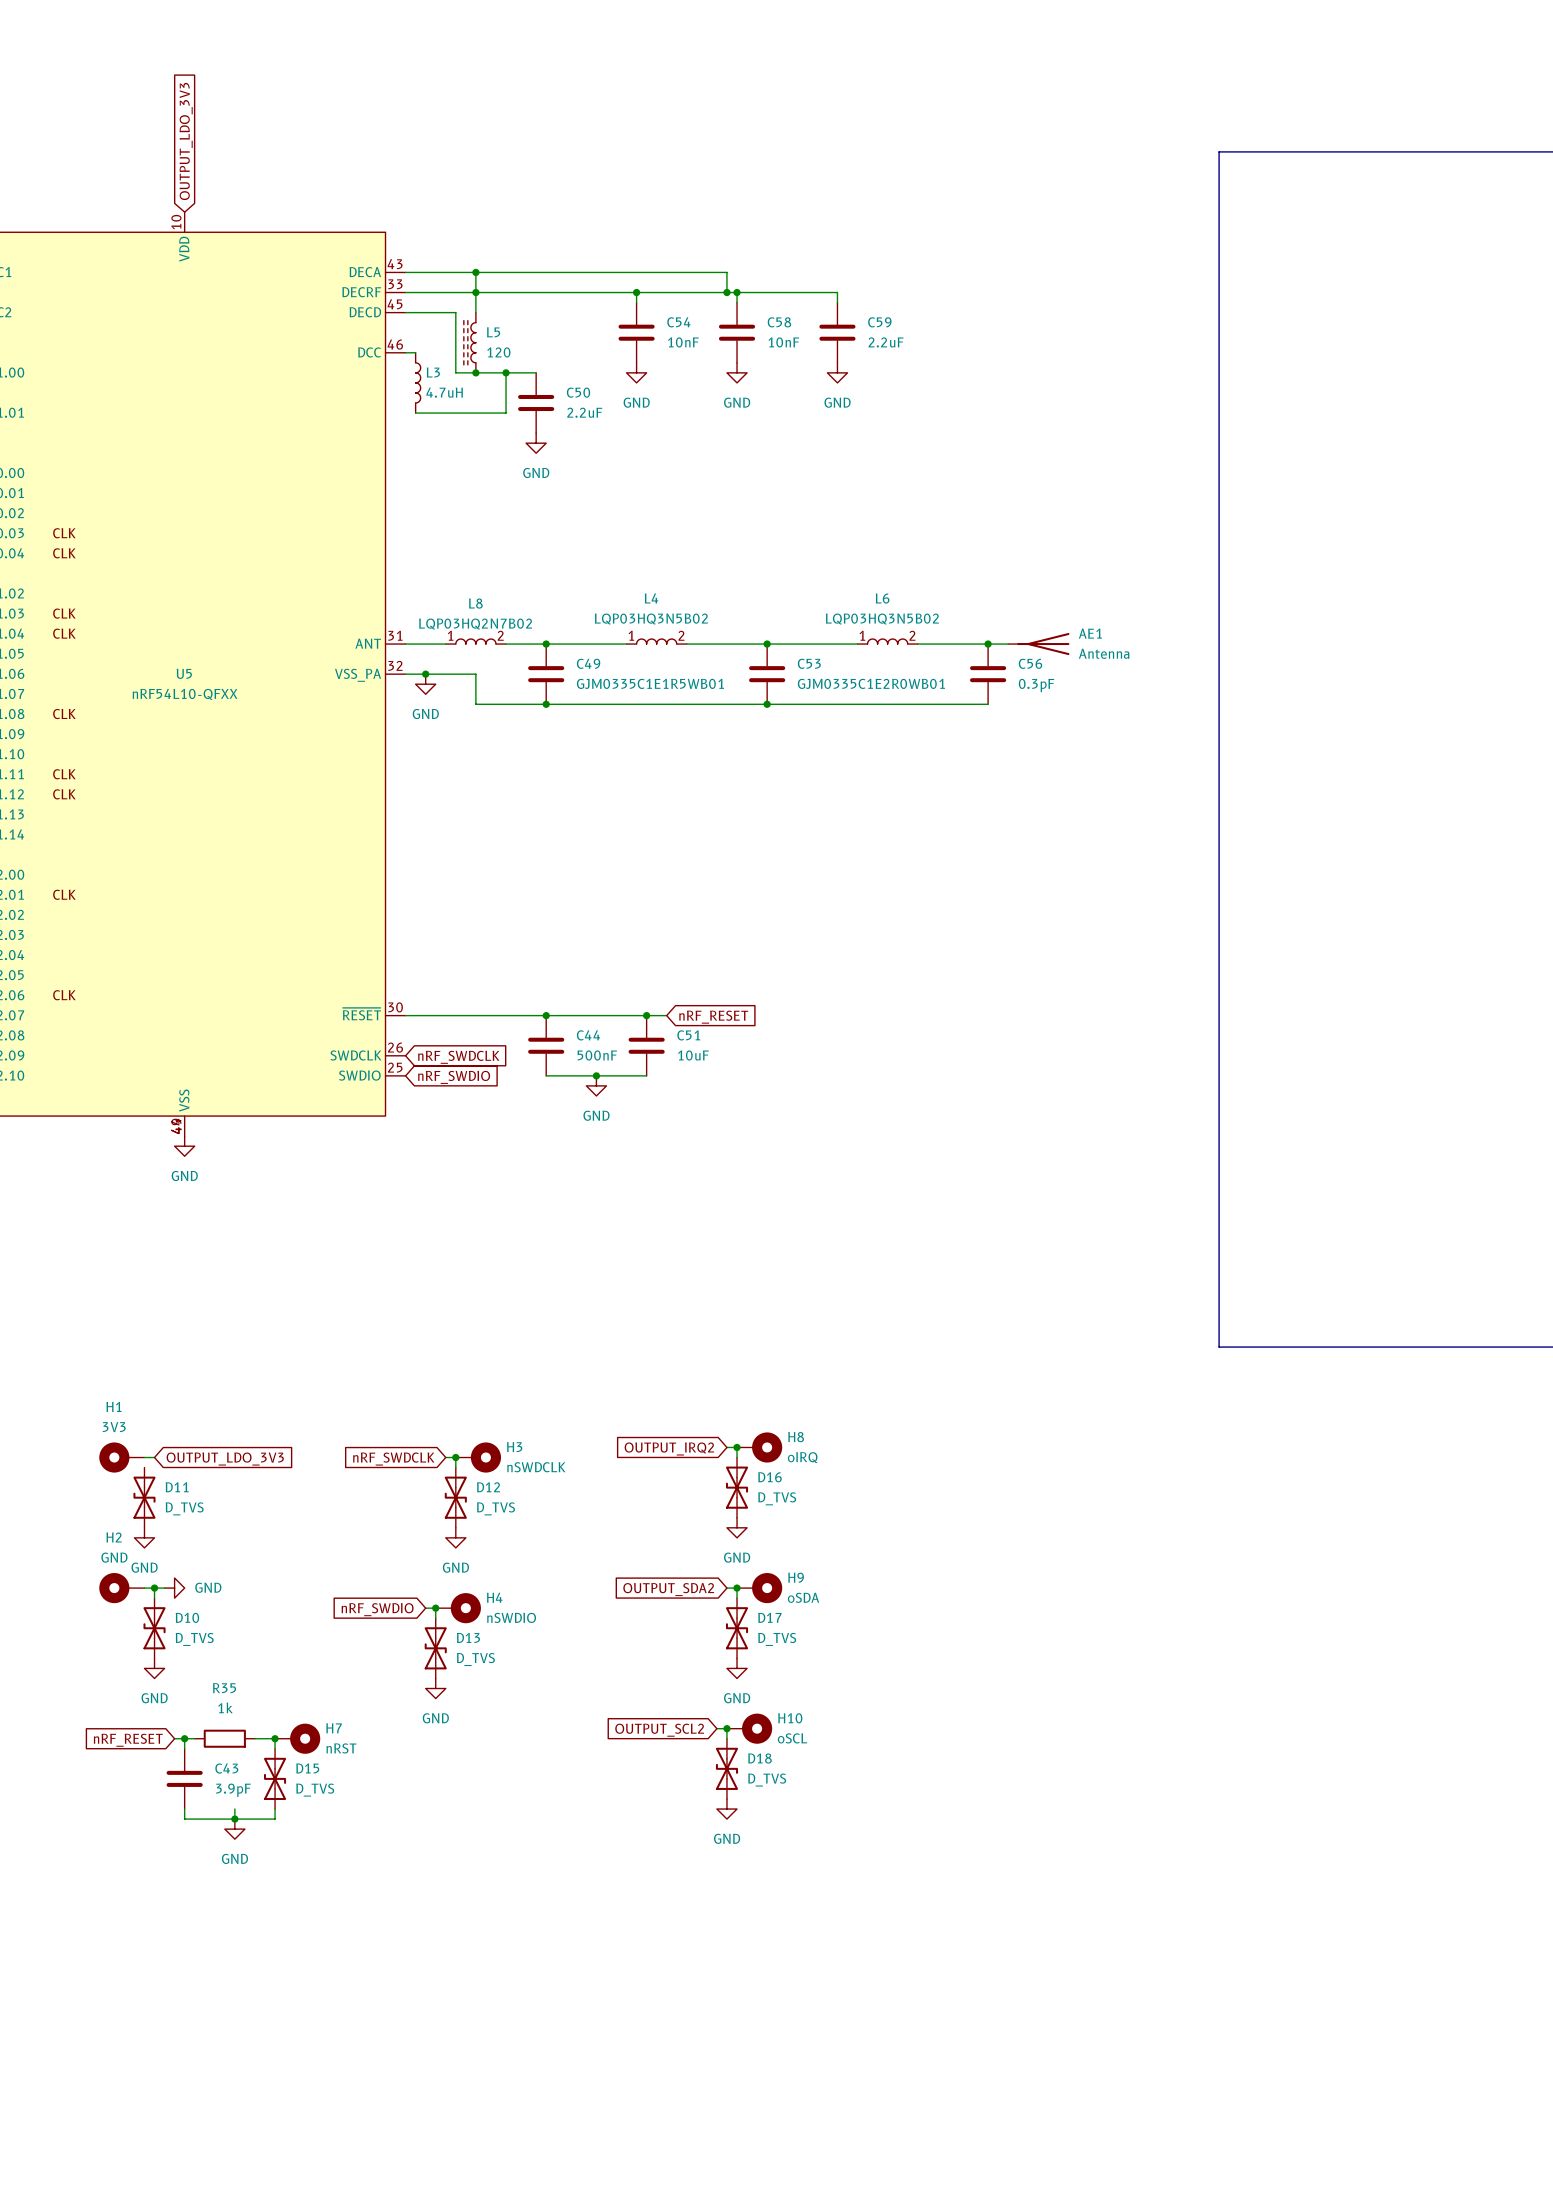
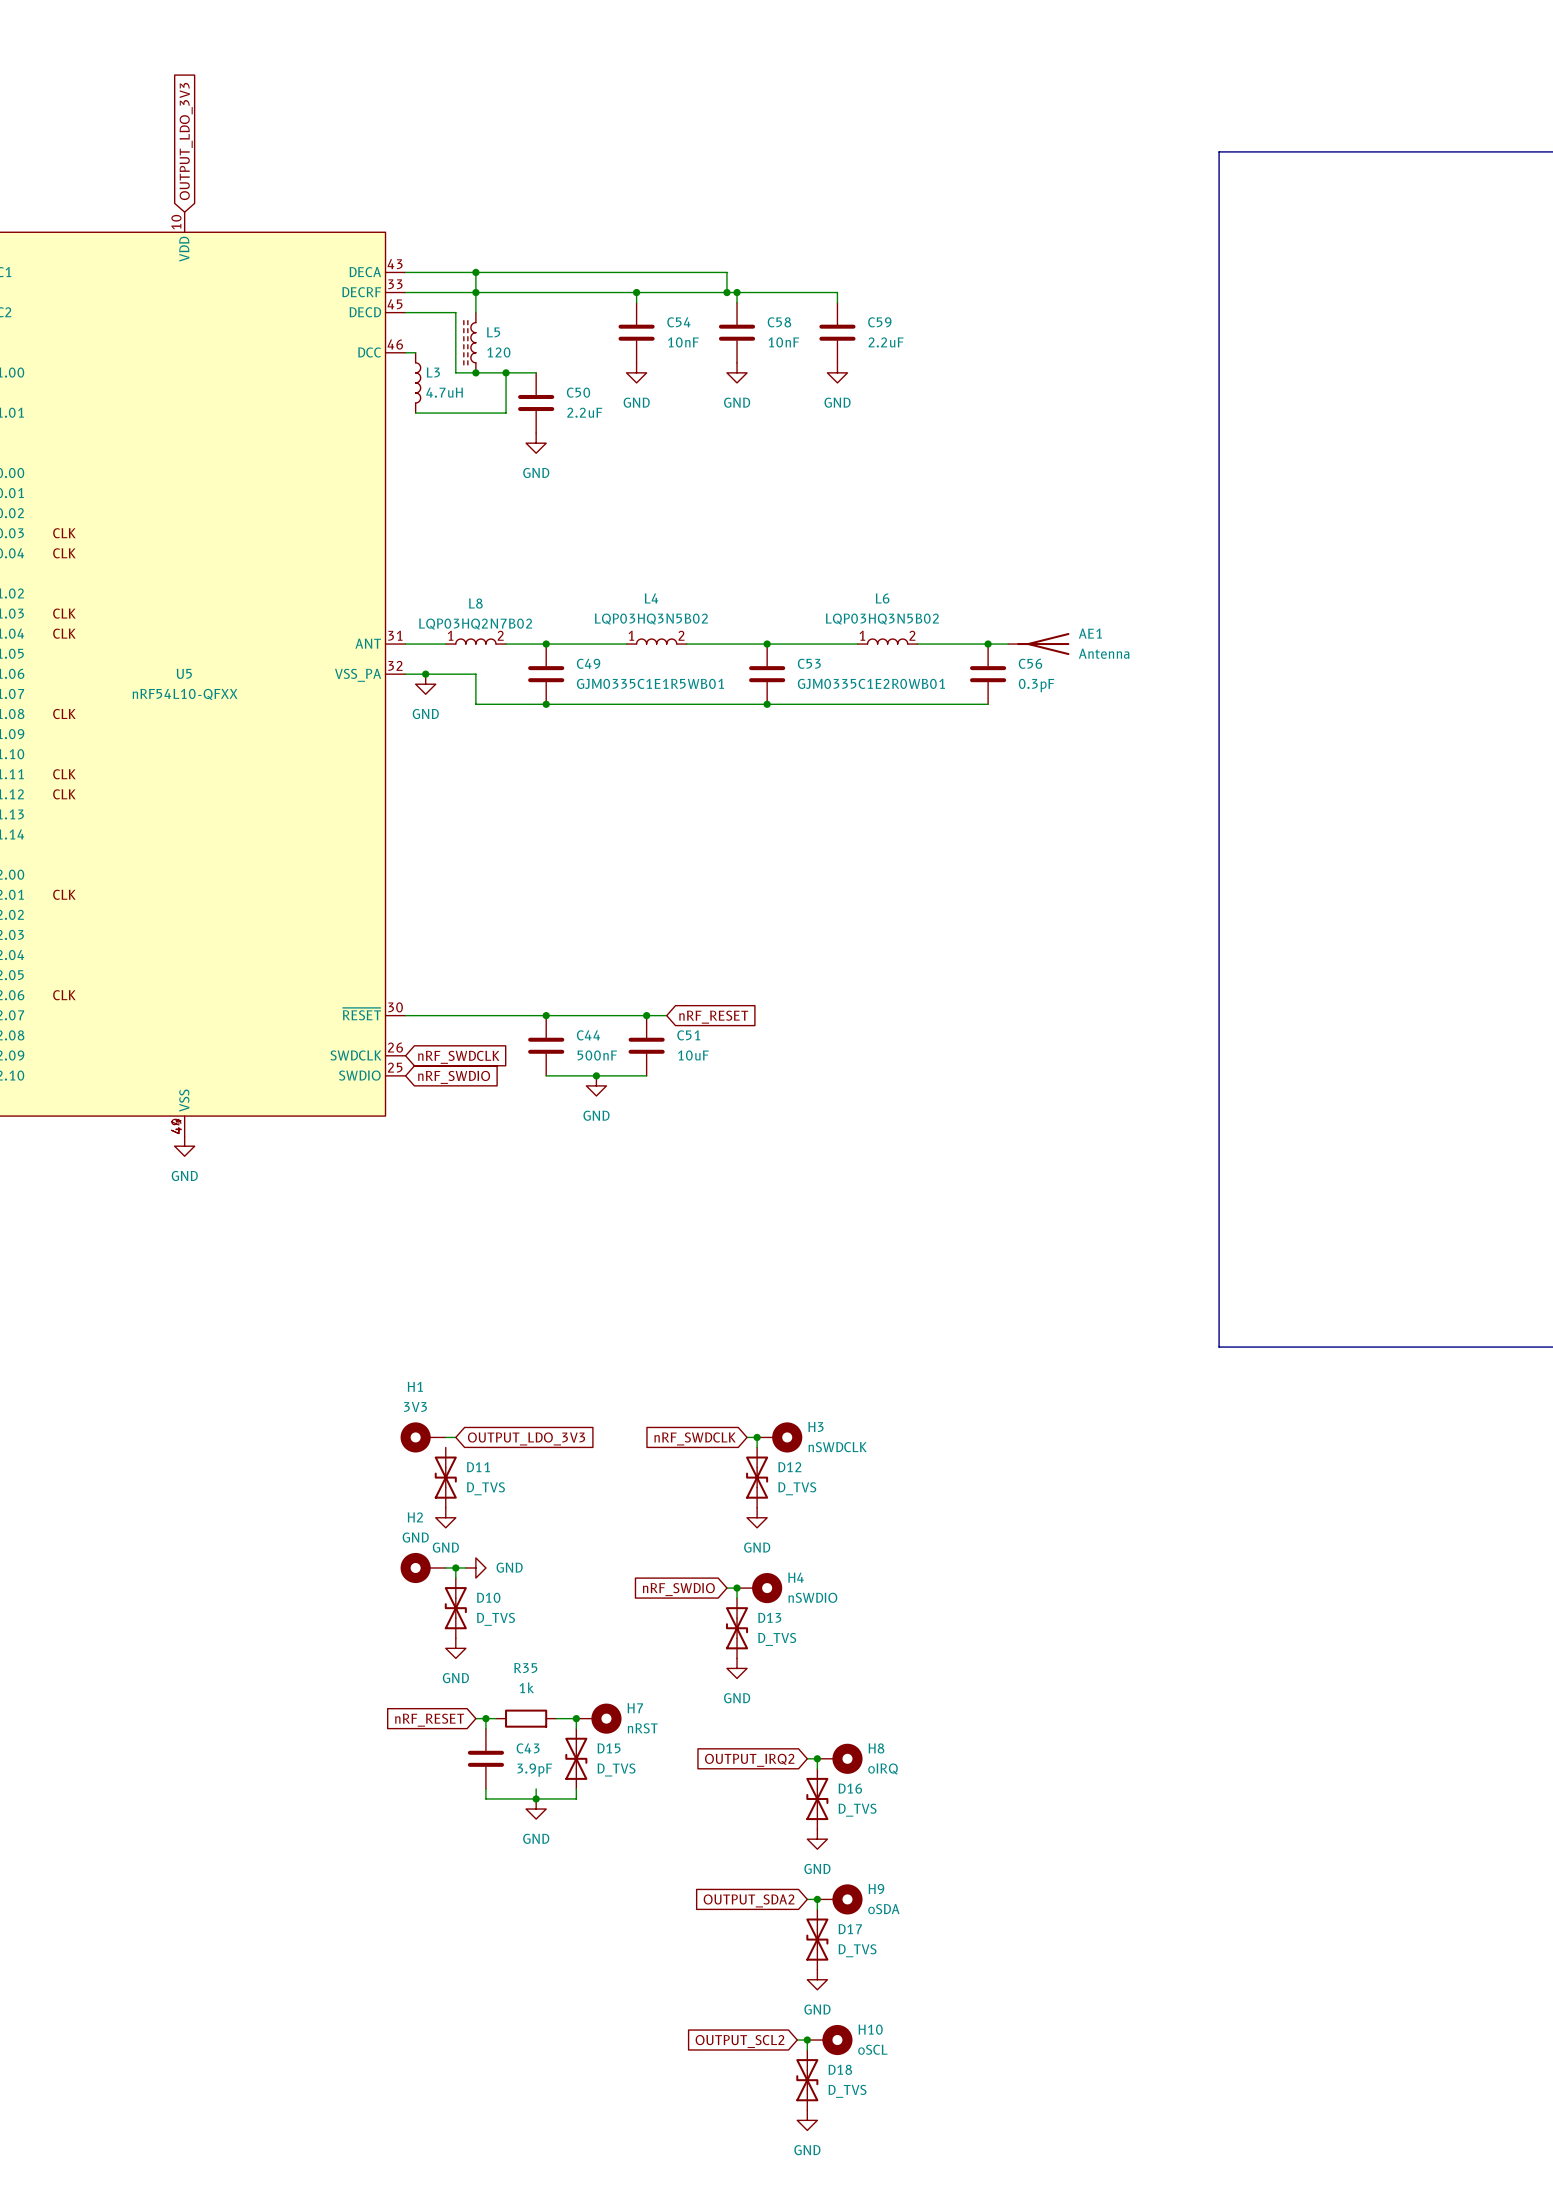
wire: none -> (445, 1437) (455, 1437)
global label: none -> OUTPUT_LDO_3V3 (526, 1438)
global label: none -> nRF_SWDCLK (695, 1438)
junction position: (737, 1447) -> (757, 1437)
H8 position: (759, 1447) -> (839, 1758)
global label: OUTPUT_IRQ2 (669, 1448) -> none
H1 position: (121, 1457) -> (423, 1437)
wire: (144, 1457) (154, 1457) -> none
junction: (455, 1457) -> none
H3 position: (478, 1457) -> (779, 1437)
global label: OUTPUT_LDO_3V3 (225, 1459) -> none
global label: nRF_SWDCLK (393, 1459) -> none
D16 position: (737, 1487) -> (817, 1798)
D11 position: (144, 1497) -> (445, 1477)
D12 position: (455, 1497) -> (757, 1477)
power symbol: none -> GND (445, 1517)
power symbol position: GND (737, 1527) -> GND (757, 1517)
power symbol: GND (144, 1537) -> none
power symbol: GND (455, 1537) -> none
wire: none -> (445, 1567) (465, 1567)
wire: none -> (455, 1567) (455, 1578)
power symbol: none -> GND (475, 1567)
H9 name: H9 (796, 1577) -> H4 (795, 1577)
H2 position: (121, 1588) -> (423, 1567)
wire: (144, 1588) (164, 1588) -> none
wire: (154, 1588) (154, 1598) -> none
junction: (154, 1588) -> none
power symbol: GND (174, 1588) -> none
global label: OUTPUT_SDA2 (668, 1589) -> nRF_SWDIO (678, 1589)
H9 value: oSDA (803, 1597) -> nSWDIO (812, 1597)
wire: (425, 1608) (435, 1608) (435, 1618) -> none
junction position: (435, 1608) -> (455, 1567)
H4: nSWDIO (458, 1608) -> none
global label: nRF_SWDIO (377, 1609) -> none
D17 name: D17 (769, 1617) -> D13 (769, 1617)
D10 position: (154, 1628) -> (455, 1608)
D13: D_TVS (435, 1648) -> none
power symbol: GND (154, 1668) -> none
power symbol position: GND (435, 1688) -> GND (455, 1648)
wire: none -> (475, 1718) (495, 1718)
wire: none -> (485, 1718) (485, 1728)
junction: none -> (485, 1718)
wire: none -> (556, 1718) (576, 1718) (576, 1728)
junction: none -> (576, 1718)
global label: none -> nRF_RESET (429, 1720)
wire: (716, 1728) (726, 1728) (726, 1738) -> (807, 1758) (817, 1758) (817, 1768)
junction: (726, 1728) -> none
H10 position: (749, 1728) -> (829, 2040)
global label: OUTPUT_SCL2 (659, 1730) -> none
wire: (174, 1738) (194, 1738) -> none
wire: (184, 1738) (184, 1748) -> none
junction: (184, 1738) -> none
R35 position: (224, 1738) -> (526, 1718)
wire: (254, 1738) (275, 1738) (275, 1748) -> none
junction: (275, 1738) -> none
H7 position: (297, 1738) -> (598, 1718)
global label: nRF_RESET (128, 1740) -> none
junction: none -> (817, 1758)
global label: none -> OUTPUT_IRQ2 (749, 1760)
D18 position: (726, 1768) -> (807, 2080)
C43 position: (184, 1778) -> (485, 1758)
D15 position: (275, 1778) -> (576, 1758)
wire: none -> (485, 1788) (485, 1798) (576, 1798) (576, 1788)
wire: none -> (536, 1788) (536, 1798)
junction: none -> (536, 1798)
wire: (184, 1809) (184, 1819) (275, 1819) (275, 1809) -> none
wire: (234, 1809) (234, 1819) -> none
power symbol: none -> GND (536, 1809)
power symbol position: GND (726, 1809) -> GND (817, 1839)
junction: (234, 1819) -> none
power symbol: GND (234, 1829) -> none
wire: none -> (807, 1899) (817, 1899) (817, 1909)
junction: none -> (817, 1899)
H9: none -> oSDA (839, 1899)
global label: none -> OUTPUT_SDA2 (749, 1900)
D17: none -> D_TVS (817, 1939)
power symbol: none -> GND (817, 1979)
wire: none -> (797, 2040) (807, 2040) (807, 2050)
junction: none -> (807, 2040)
global label: none -> OUTPUT_SCL2 (739, 2041)
power symbol: none -> GND (807, 2120)

